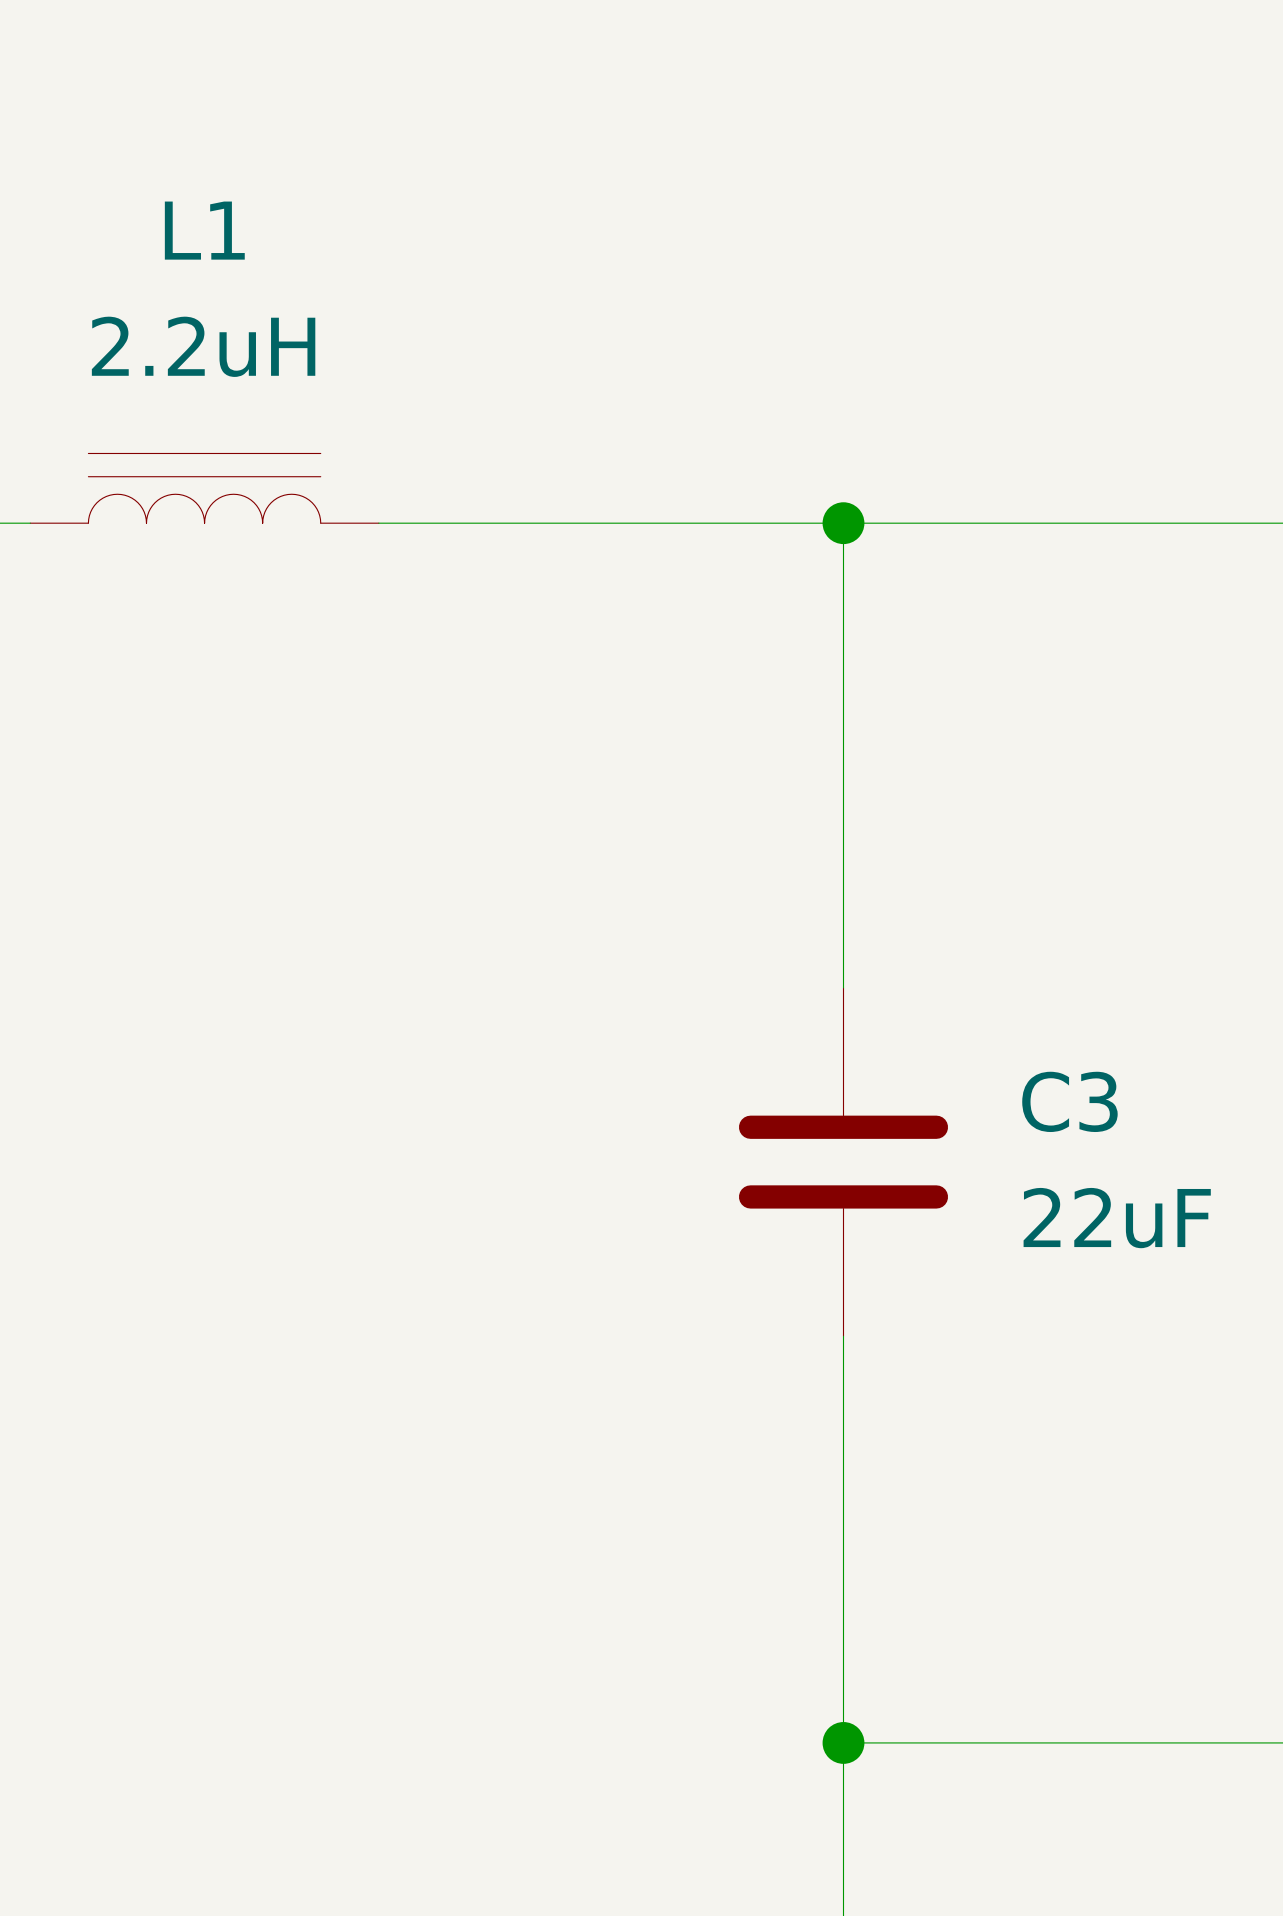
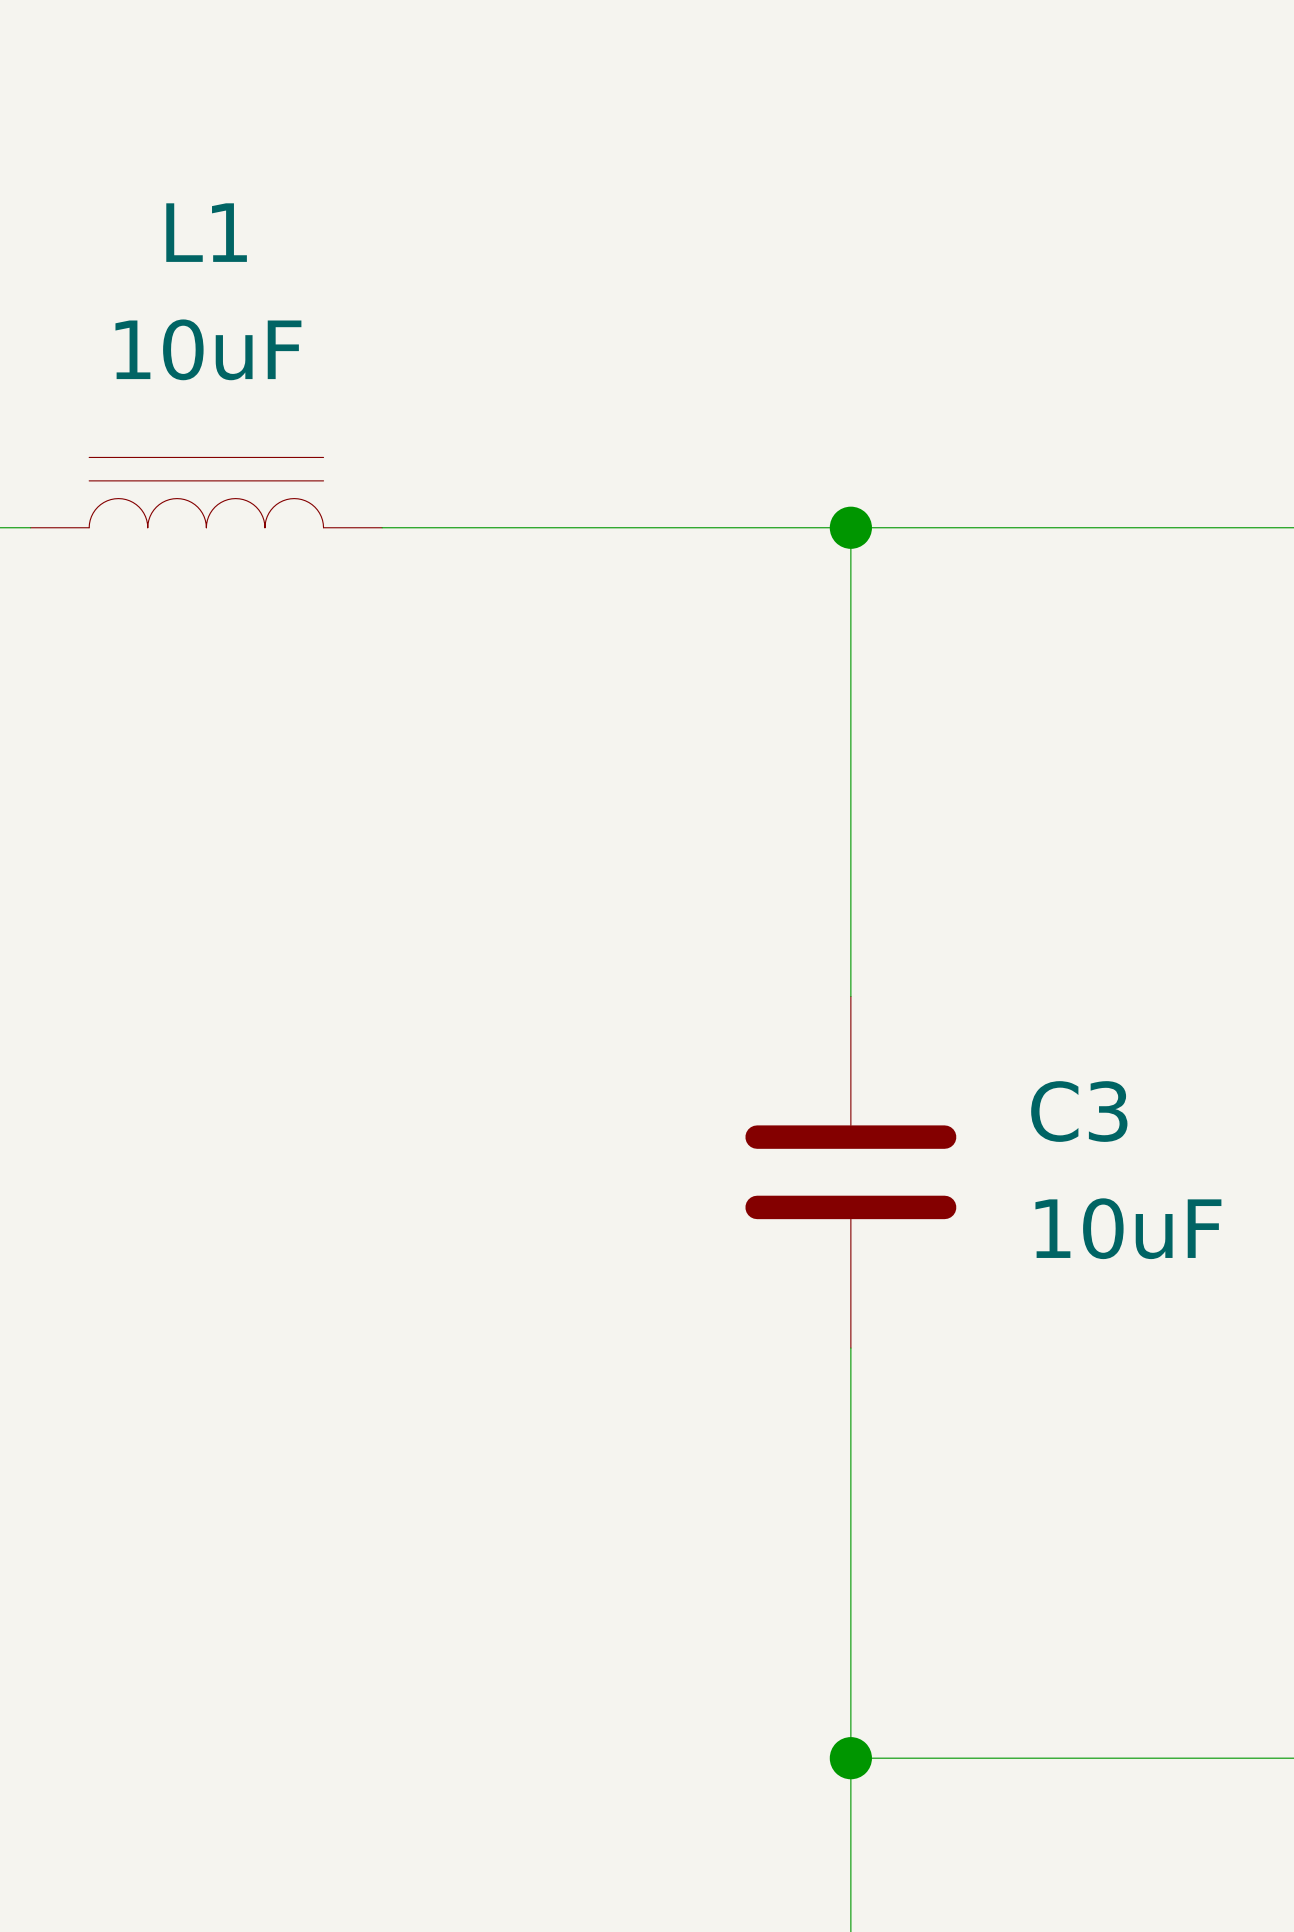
L1 value: 2.2uH (203, 346) -> 10uF (208, 349)
C3 value: 22uF (1117, 1218) -> 10uF (1128, 1228)

